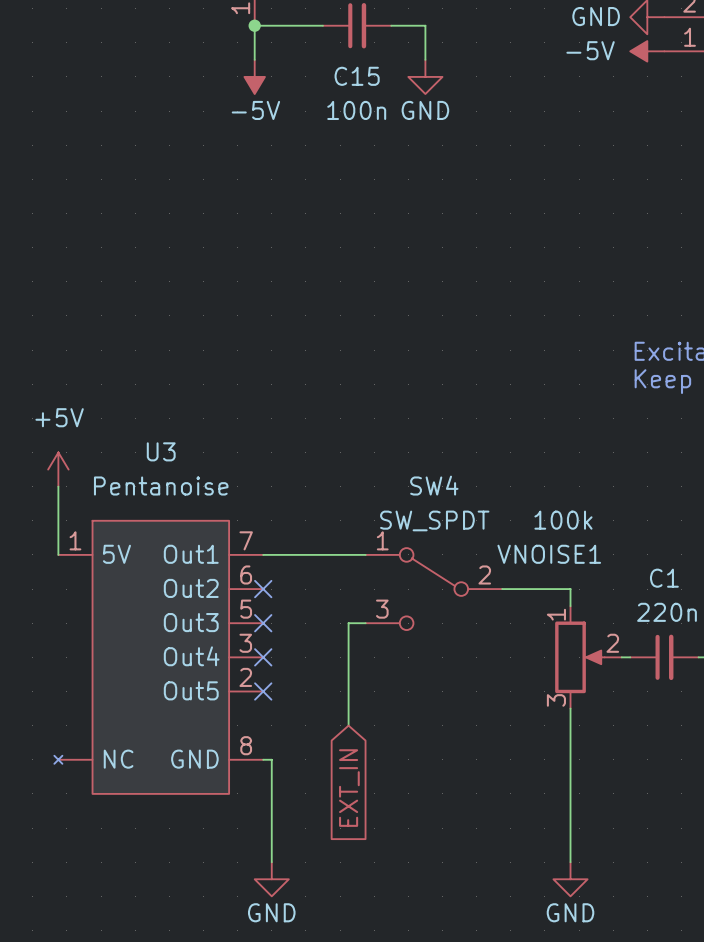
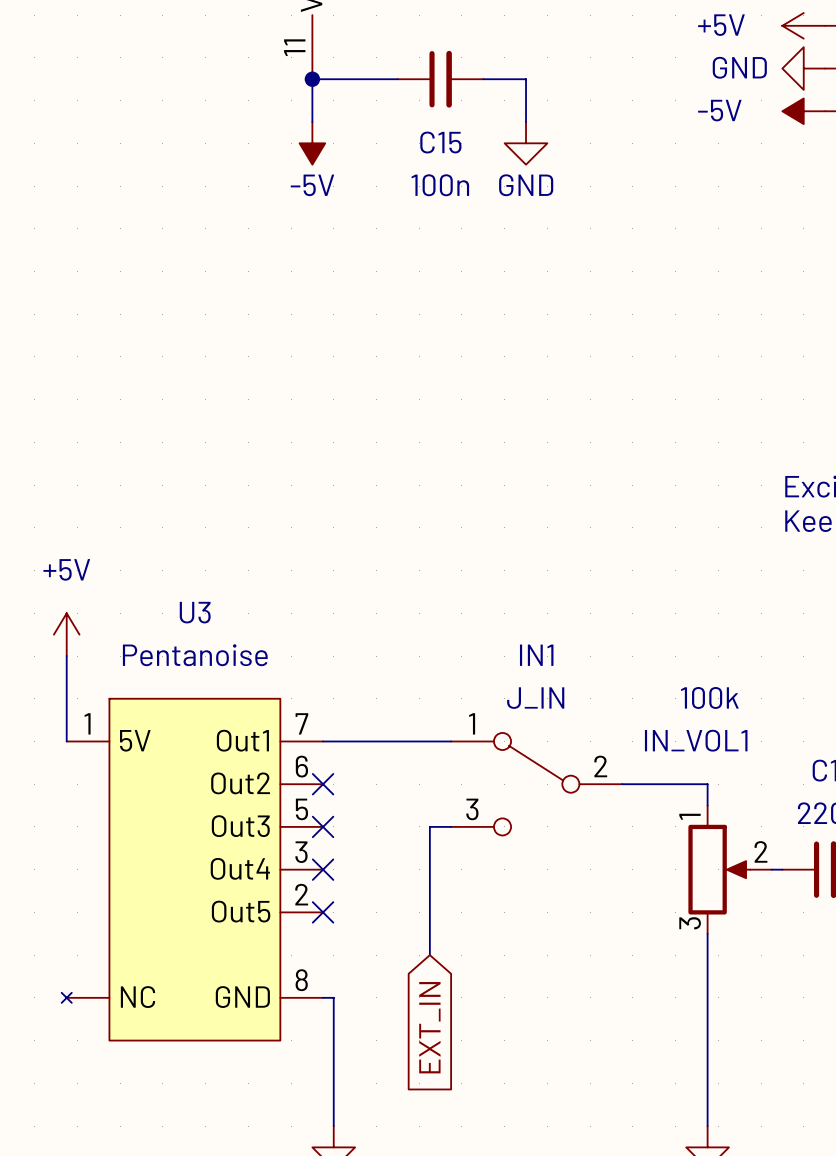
SW4 name: SW4 (434, 485) -> IN1 (536, 655)
SW4 value: SW_SPDT (434, 520) -> J_IN (535, 698)
VNOISE1 name: VNOISE1 (549, 554) -> IN_VOL1 (696, 740)

